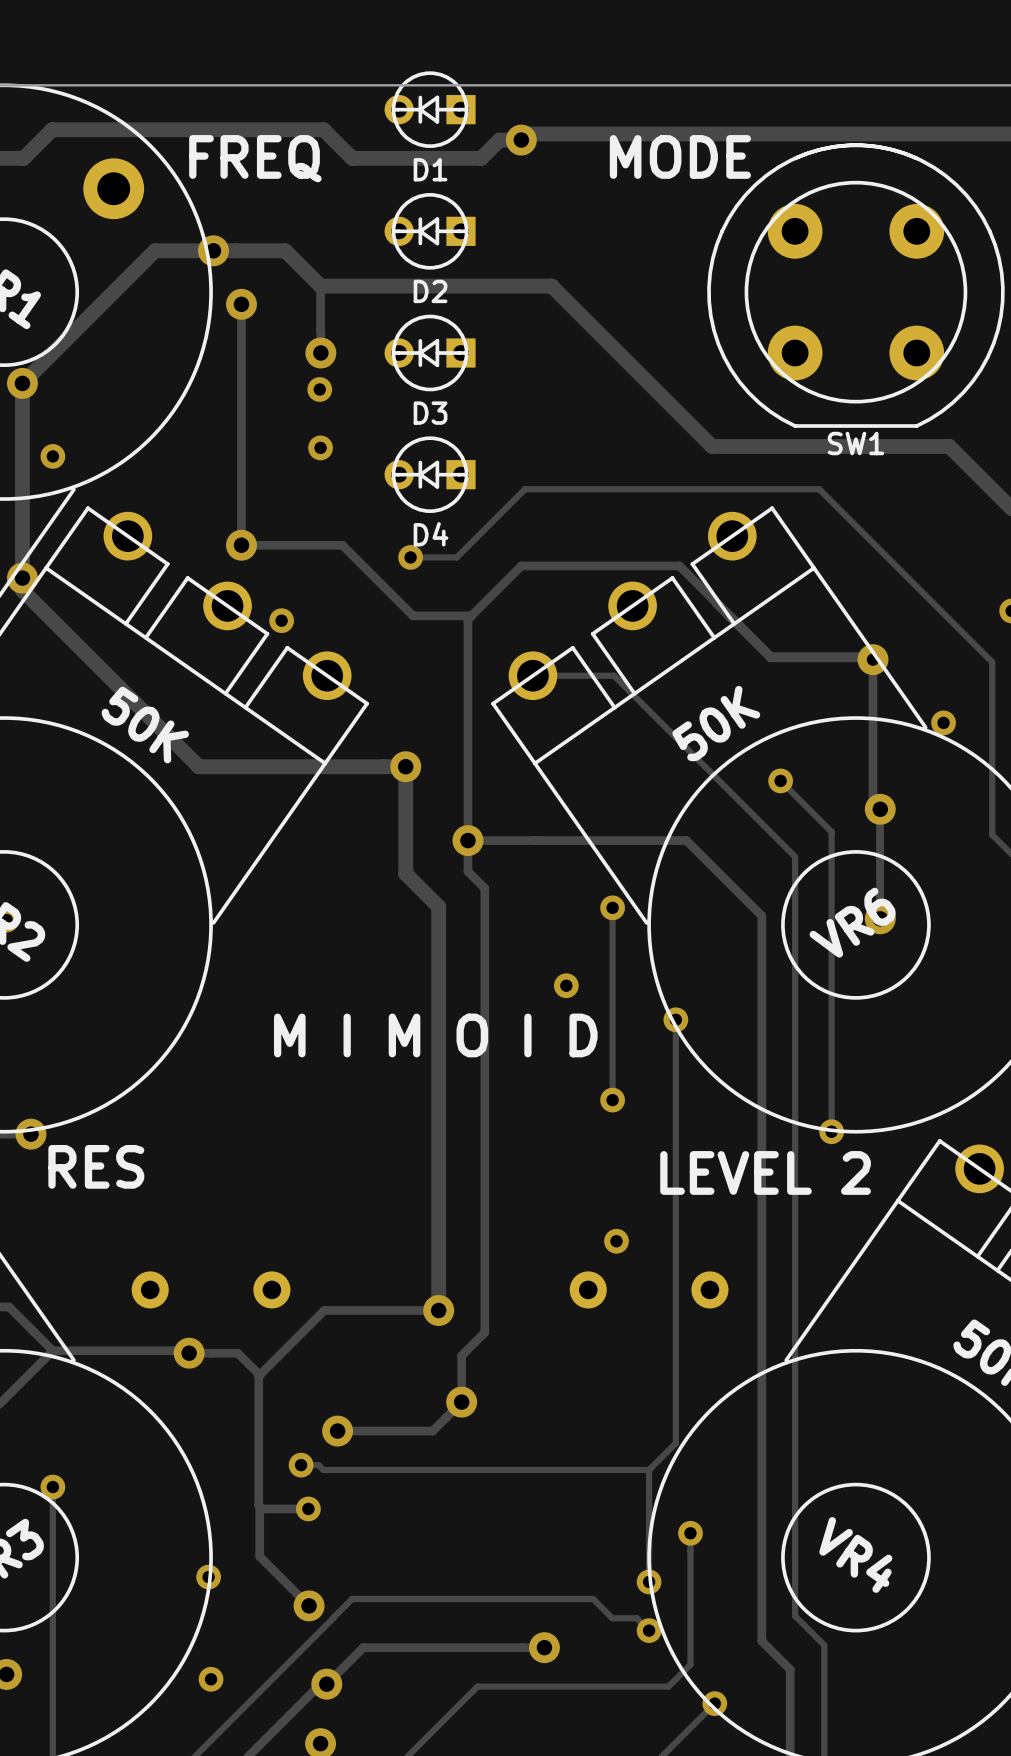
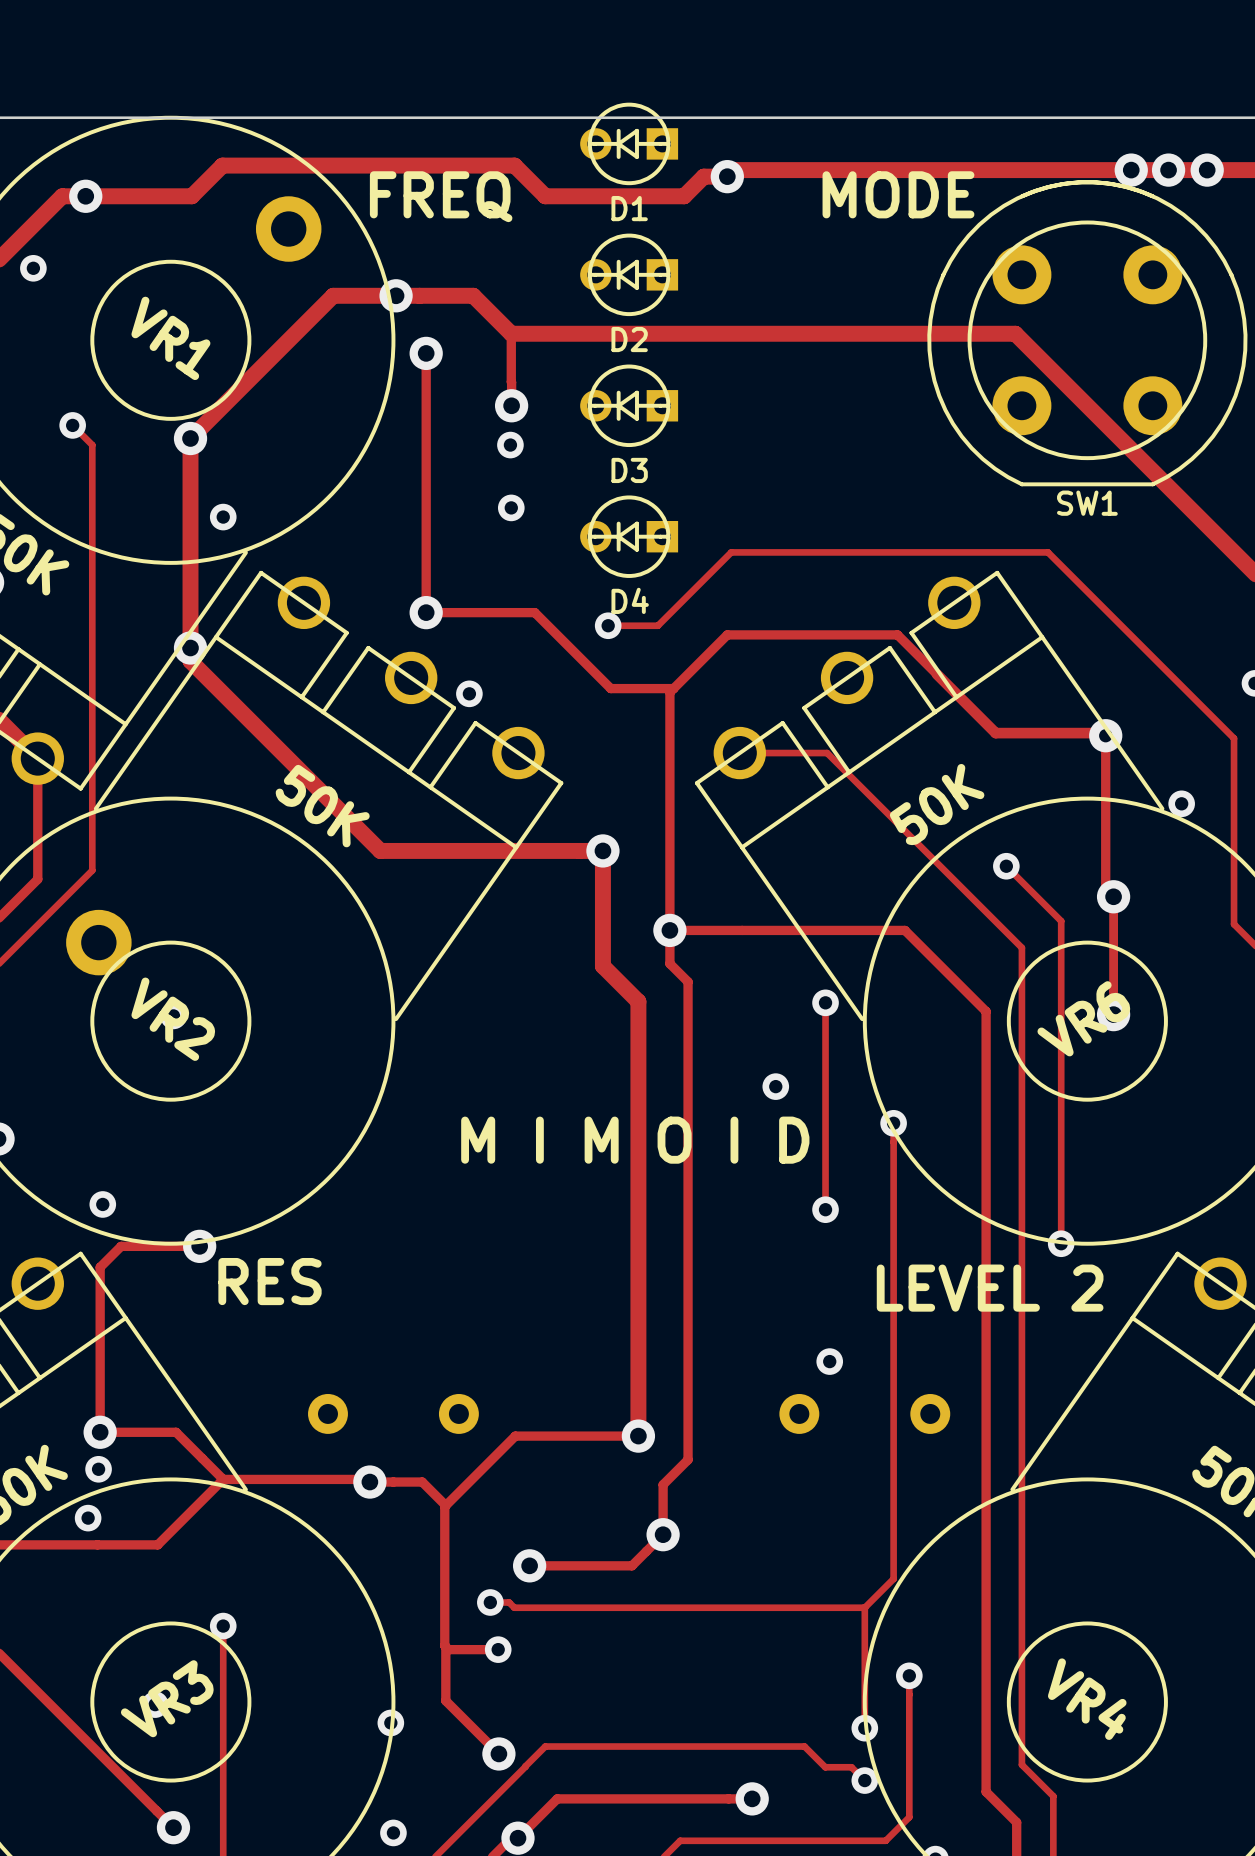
via: none -> (1131, 170)
via: none -> (1168, 170)
via: none -> (1207, 170)
track: (551, 286) (712, 446) (949, 446) -> (760, 333) (1015, 333) (1187, 506)

